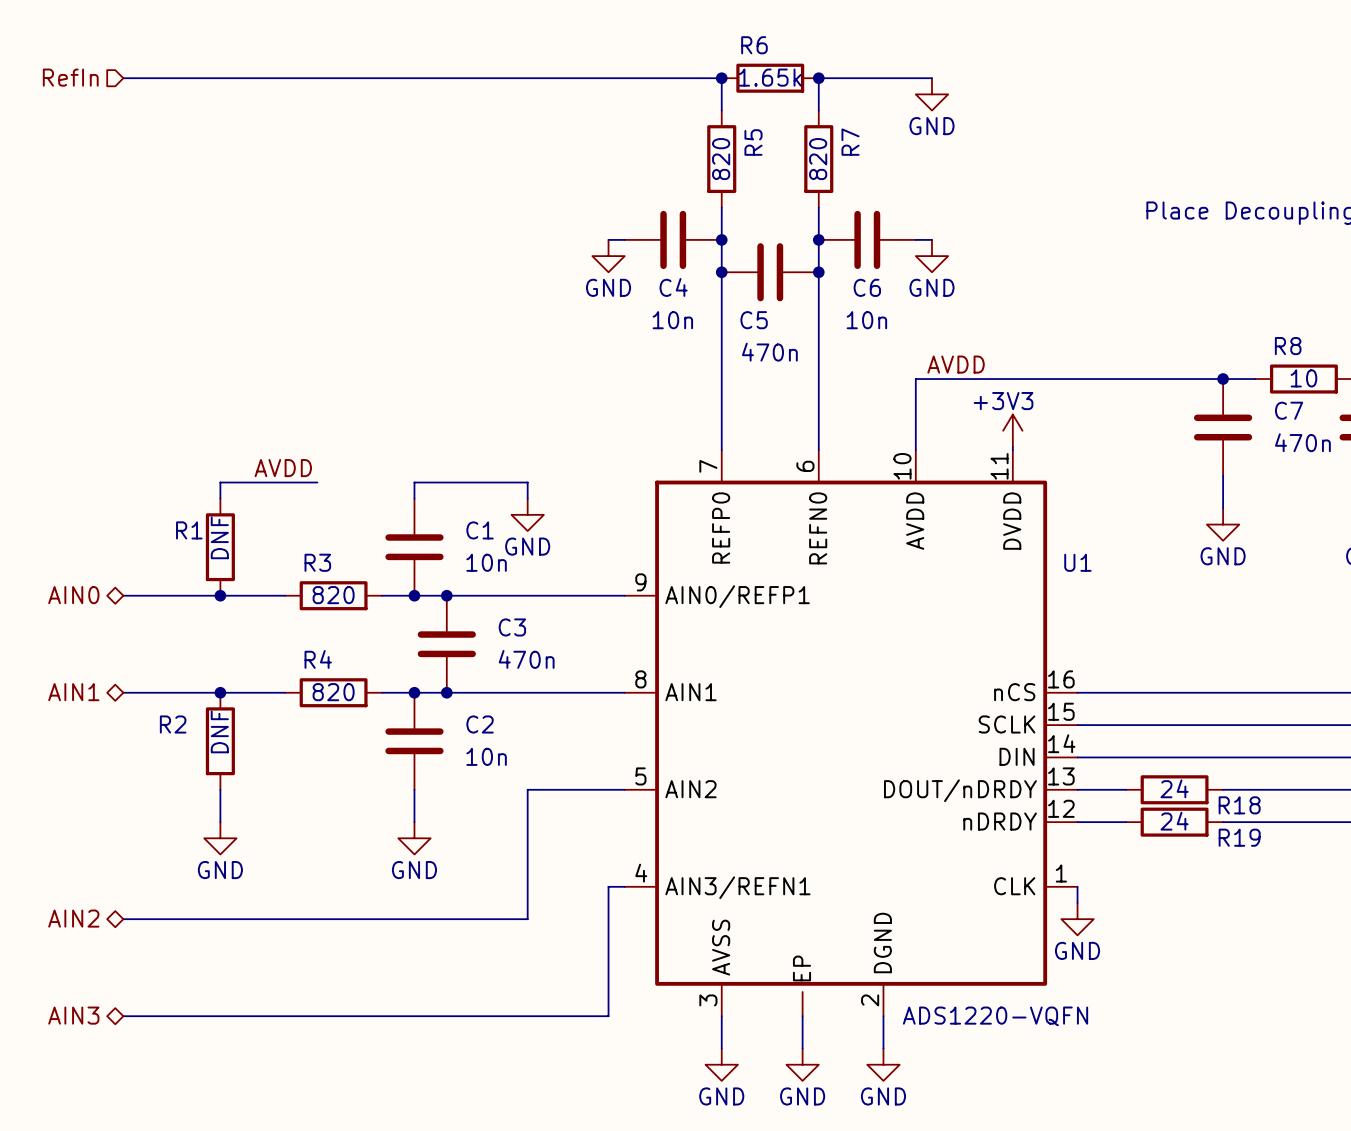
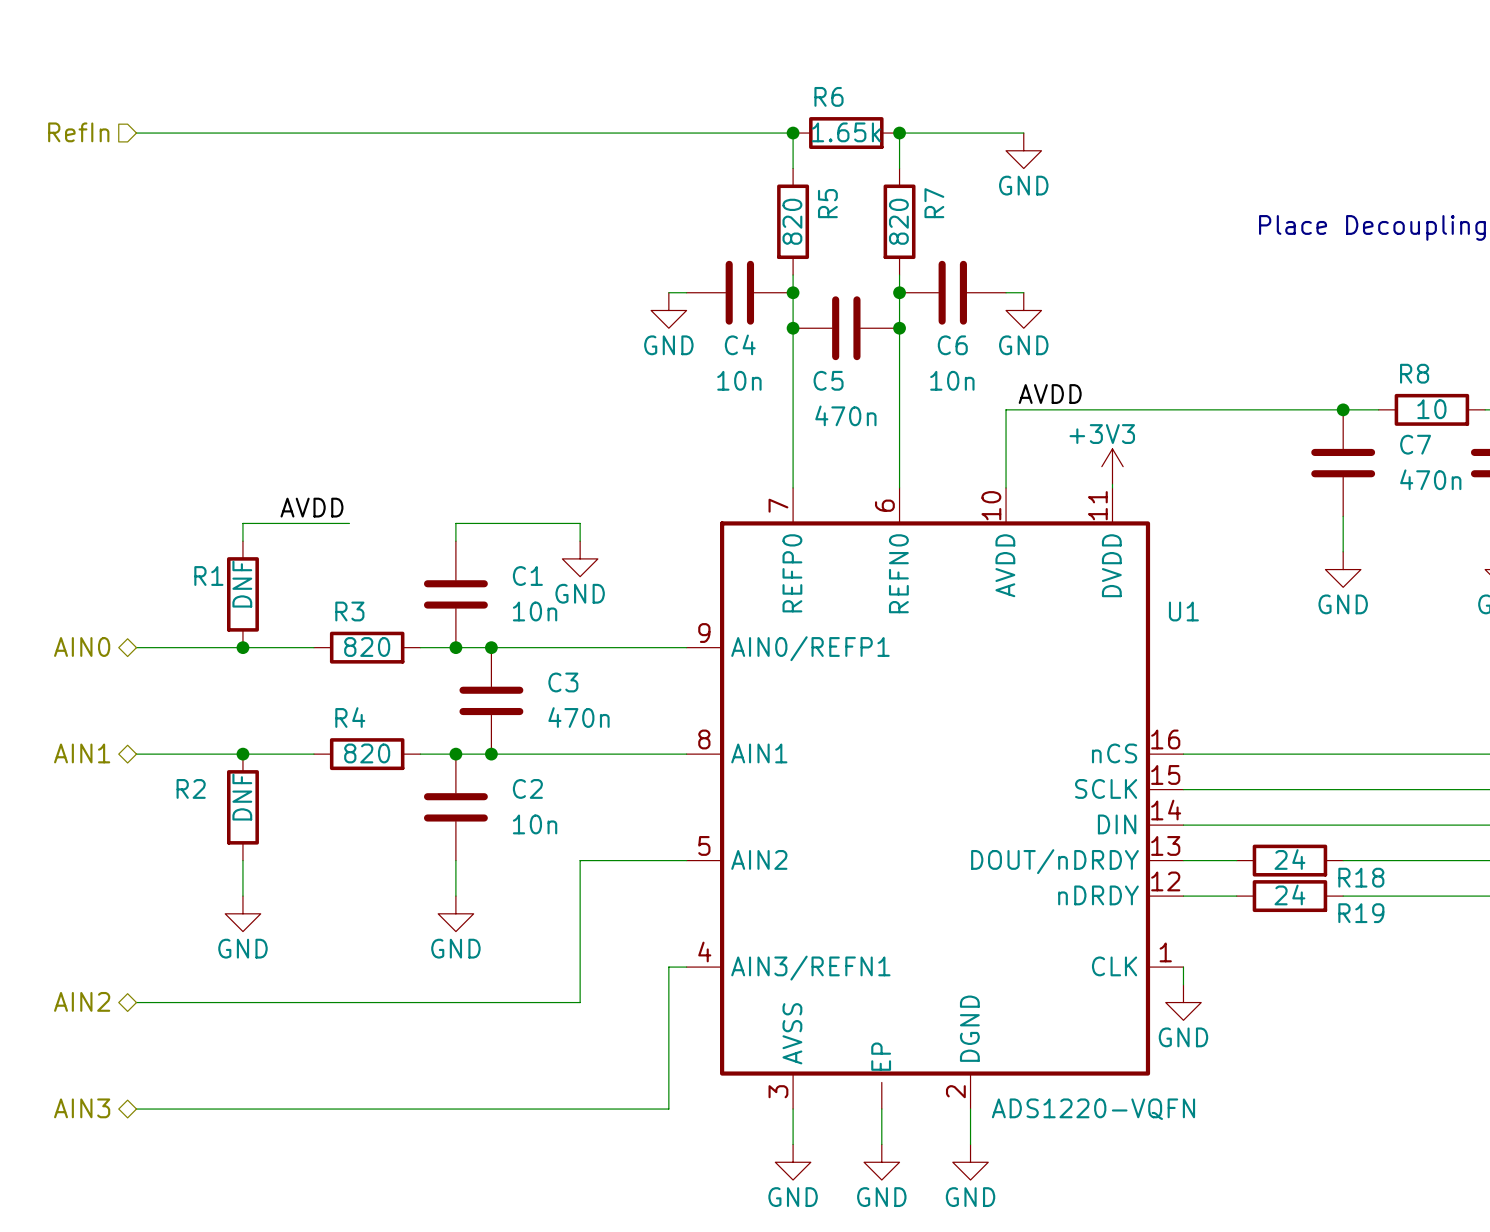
hierarchical label position: RefIn (70, 77) -> RefIn (78, 132)
wire: (123, 78) (721, 78) (721, 110) -> (136, 133) (793, 133) (793, 168)
junction position: (721, 78) -> (793, 133)
R6 position: (770, 78) -> (846, 133)
junction position: (818, 78) -> (899, 133)
wire: (931, 78) (818, 78) (818, 110) -> (1023, 133) (899, 133) (899, 168)
power symbol position: GND (931, 94) -> GND (1023, 150)
R5 position: (721, 159) -> (793, 221)
R7 position: (818, 159) -> (899, 221)
wire: (721, 207) (721, 256) -> none
wire: (818, 207) (818, 256) -> none
wire: (608, 239) (624, 239) -> (668, 292) (686, 292)
C4 position: (673, 239) -> (739, 292)
junction: (721, 239) -> none
junction: (818, 239) -> none
C6 position: (867, 239) -> (952, 292)
wire: (915, 239) (931, 239) -> (1006, 292) (1023, 292)
power symbol position: GND (608, 256) -> GND (668, 310)
power symbol position: GND (931, 256) -> GND (1023, 310)
C5 position: (770, 272) -> (846, 328)
junction: none -> (793, 328)
junction: none -> (899, 328)

